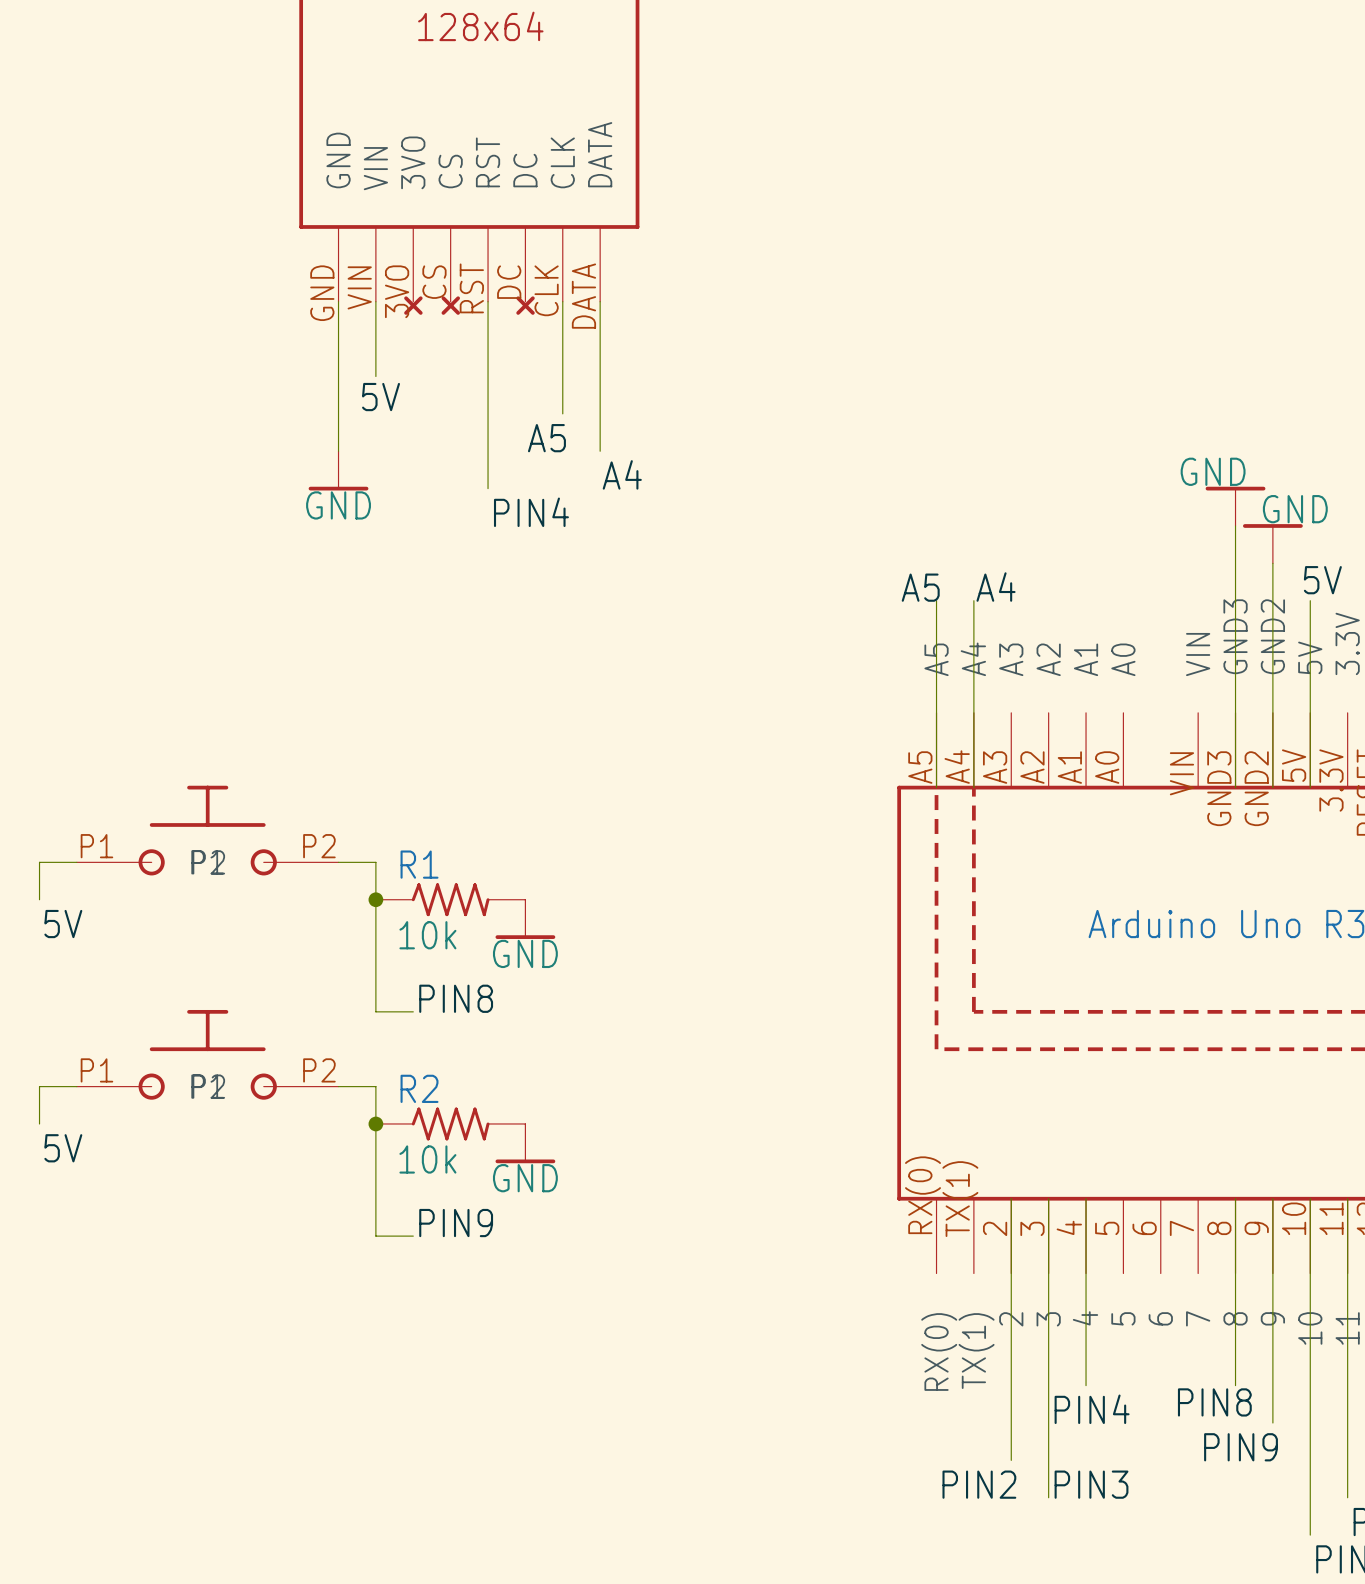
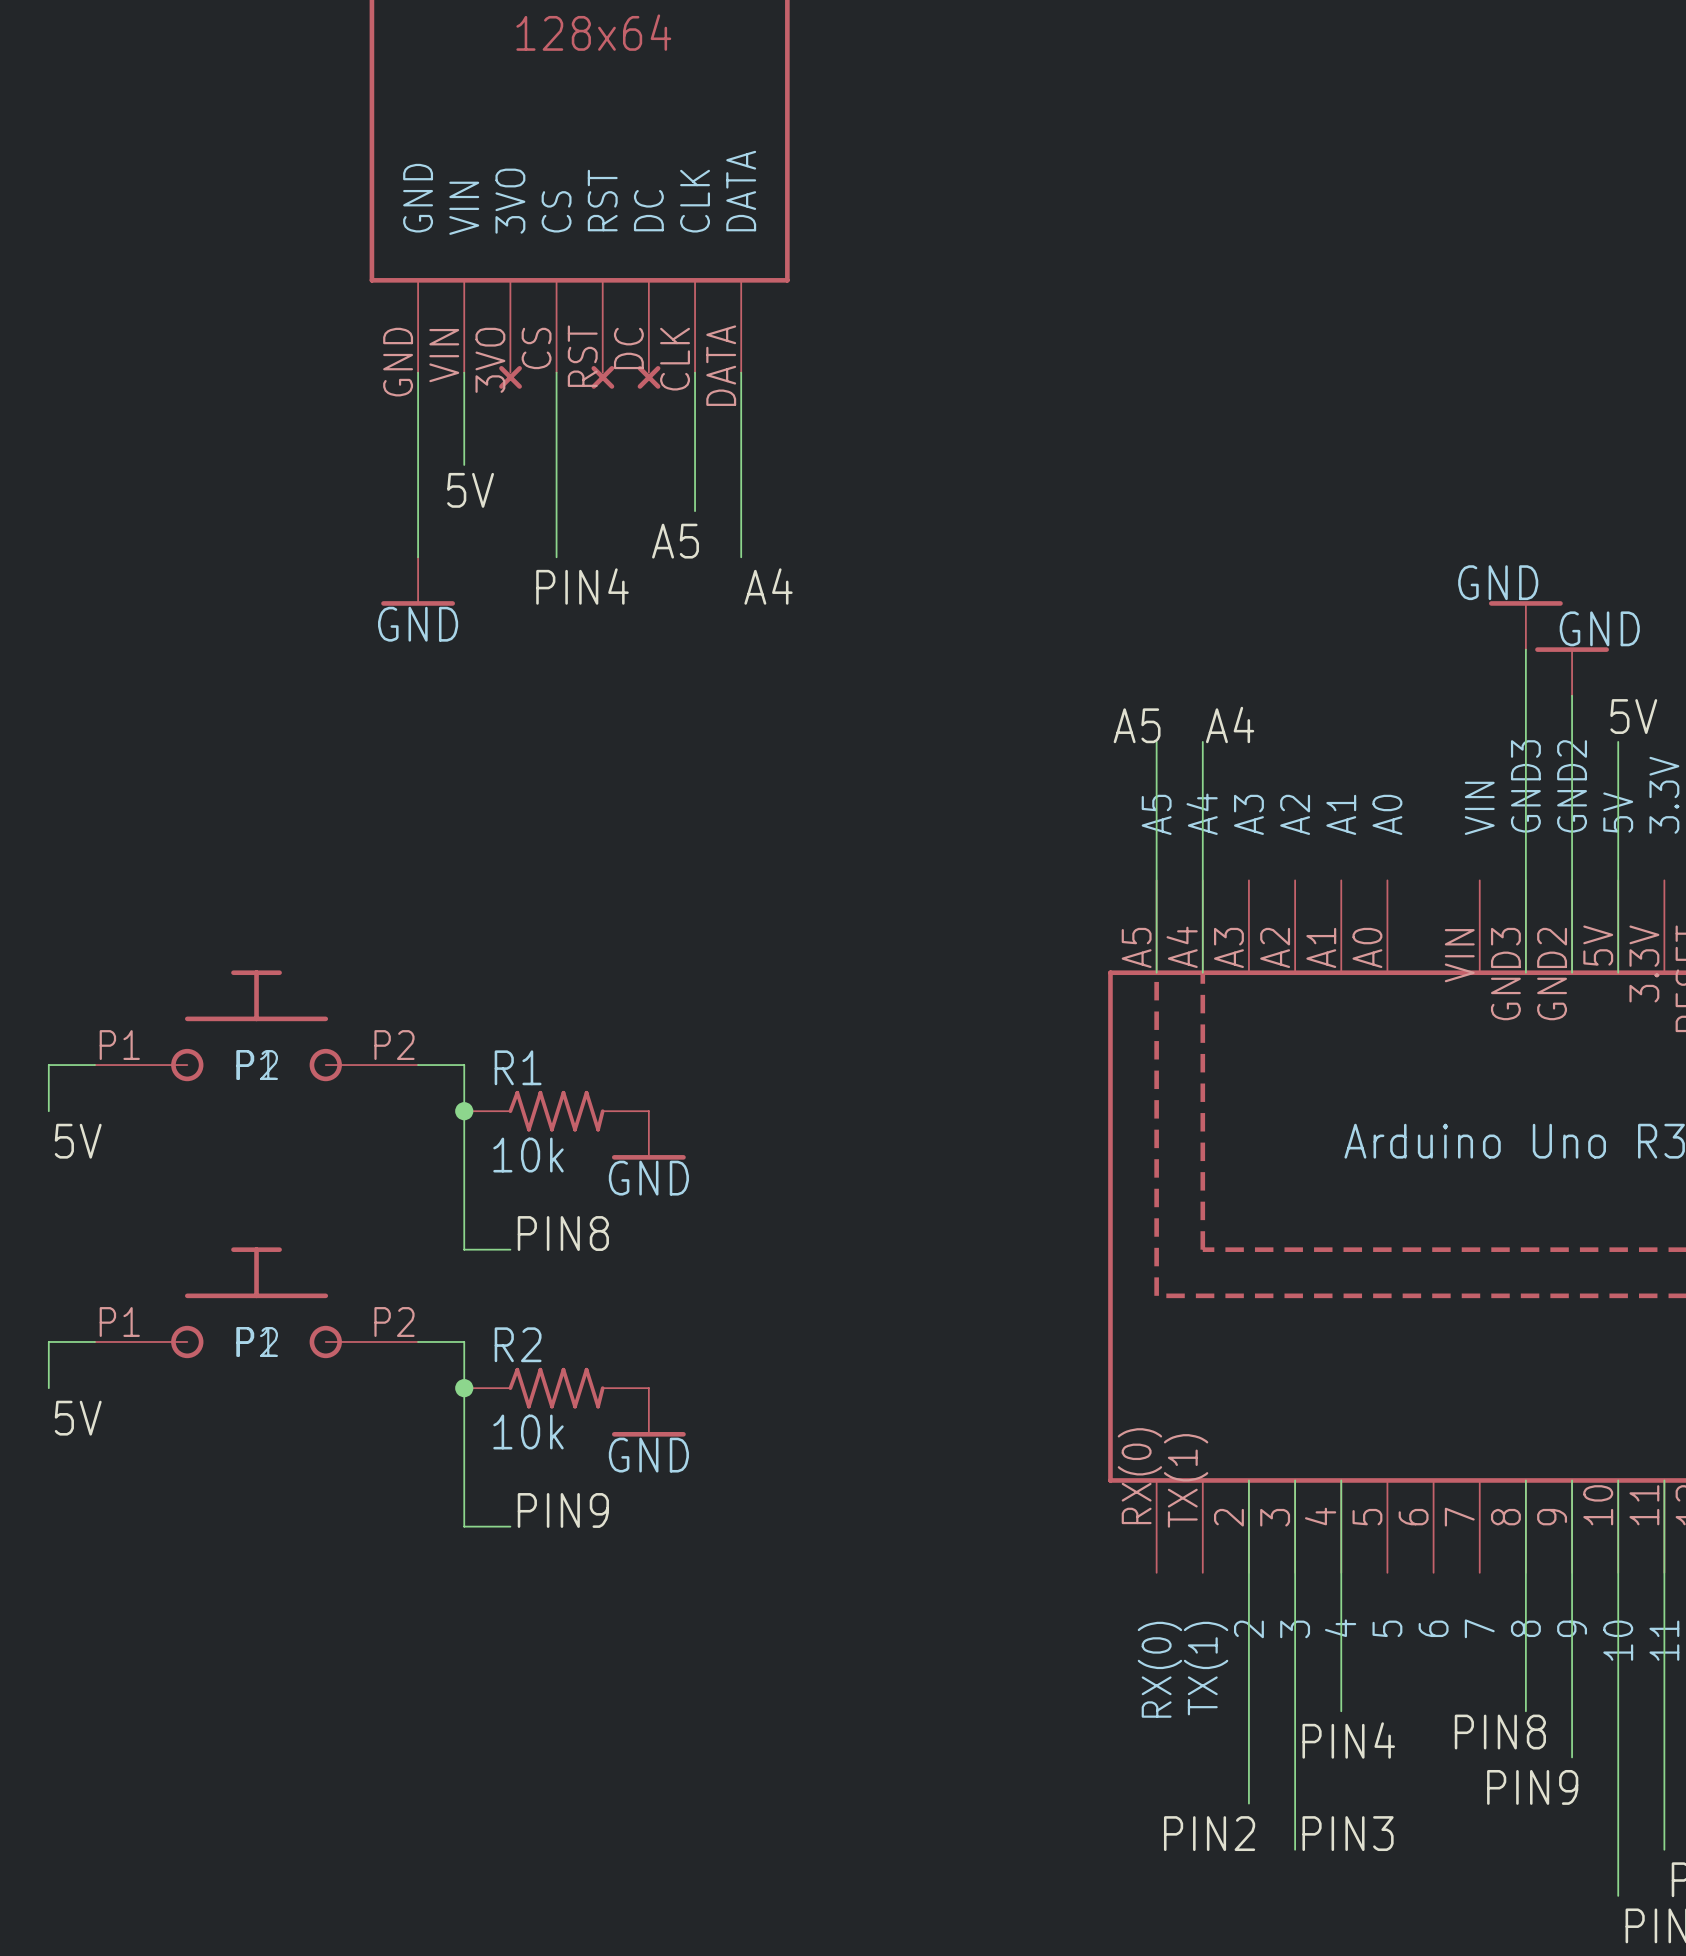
wire: none -> (556, 372) (556, 557)
wire: (488, 301) (488, 488) -> none
part position: (450, 305) -> (602, 377)
label position: PIN4 (531, 512) -> PIN4 (582, 586)

